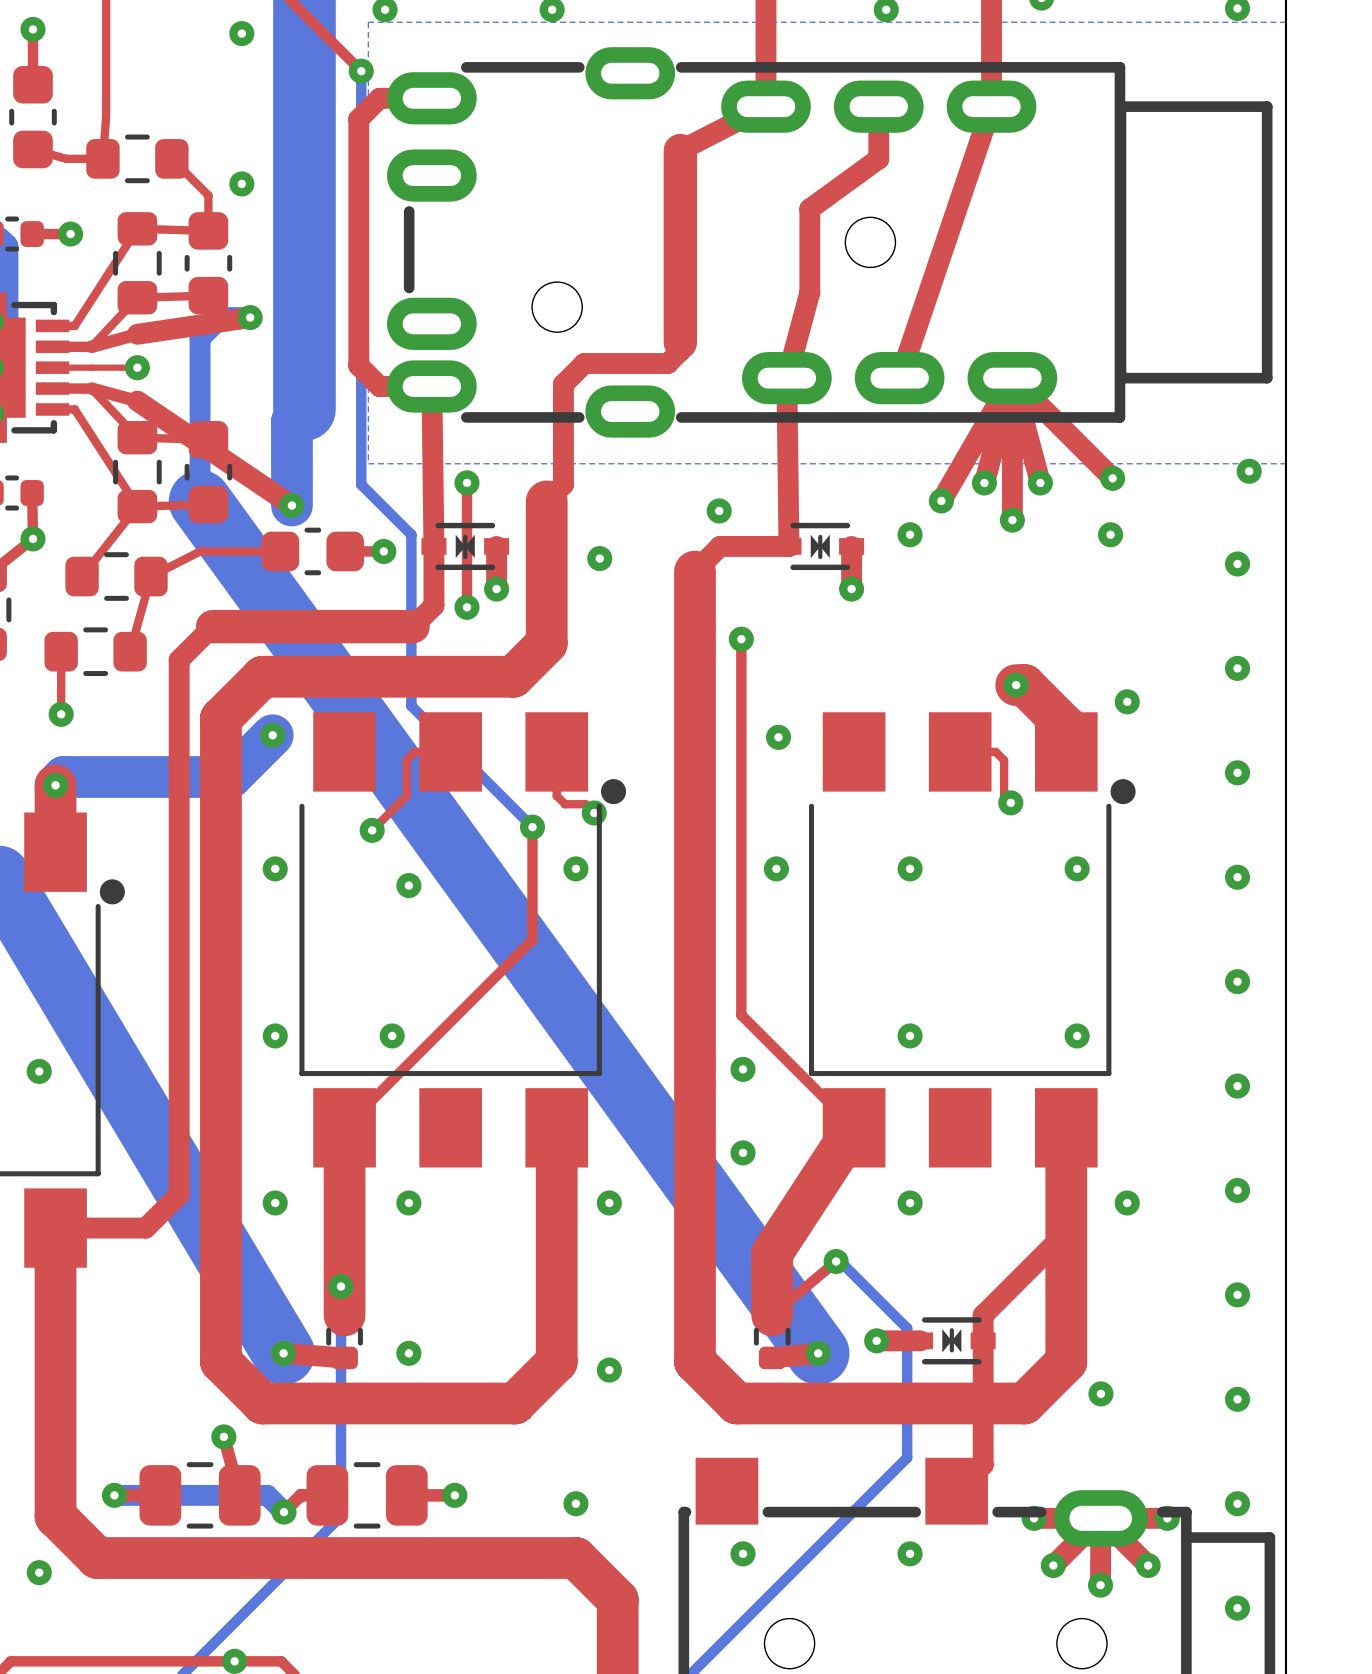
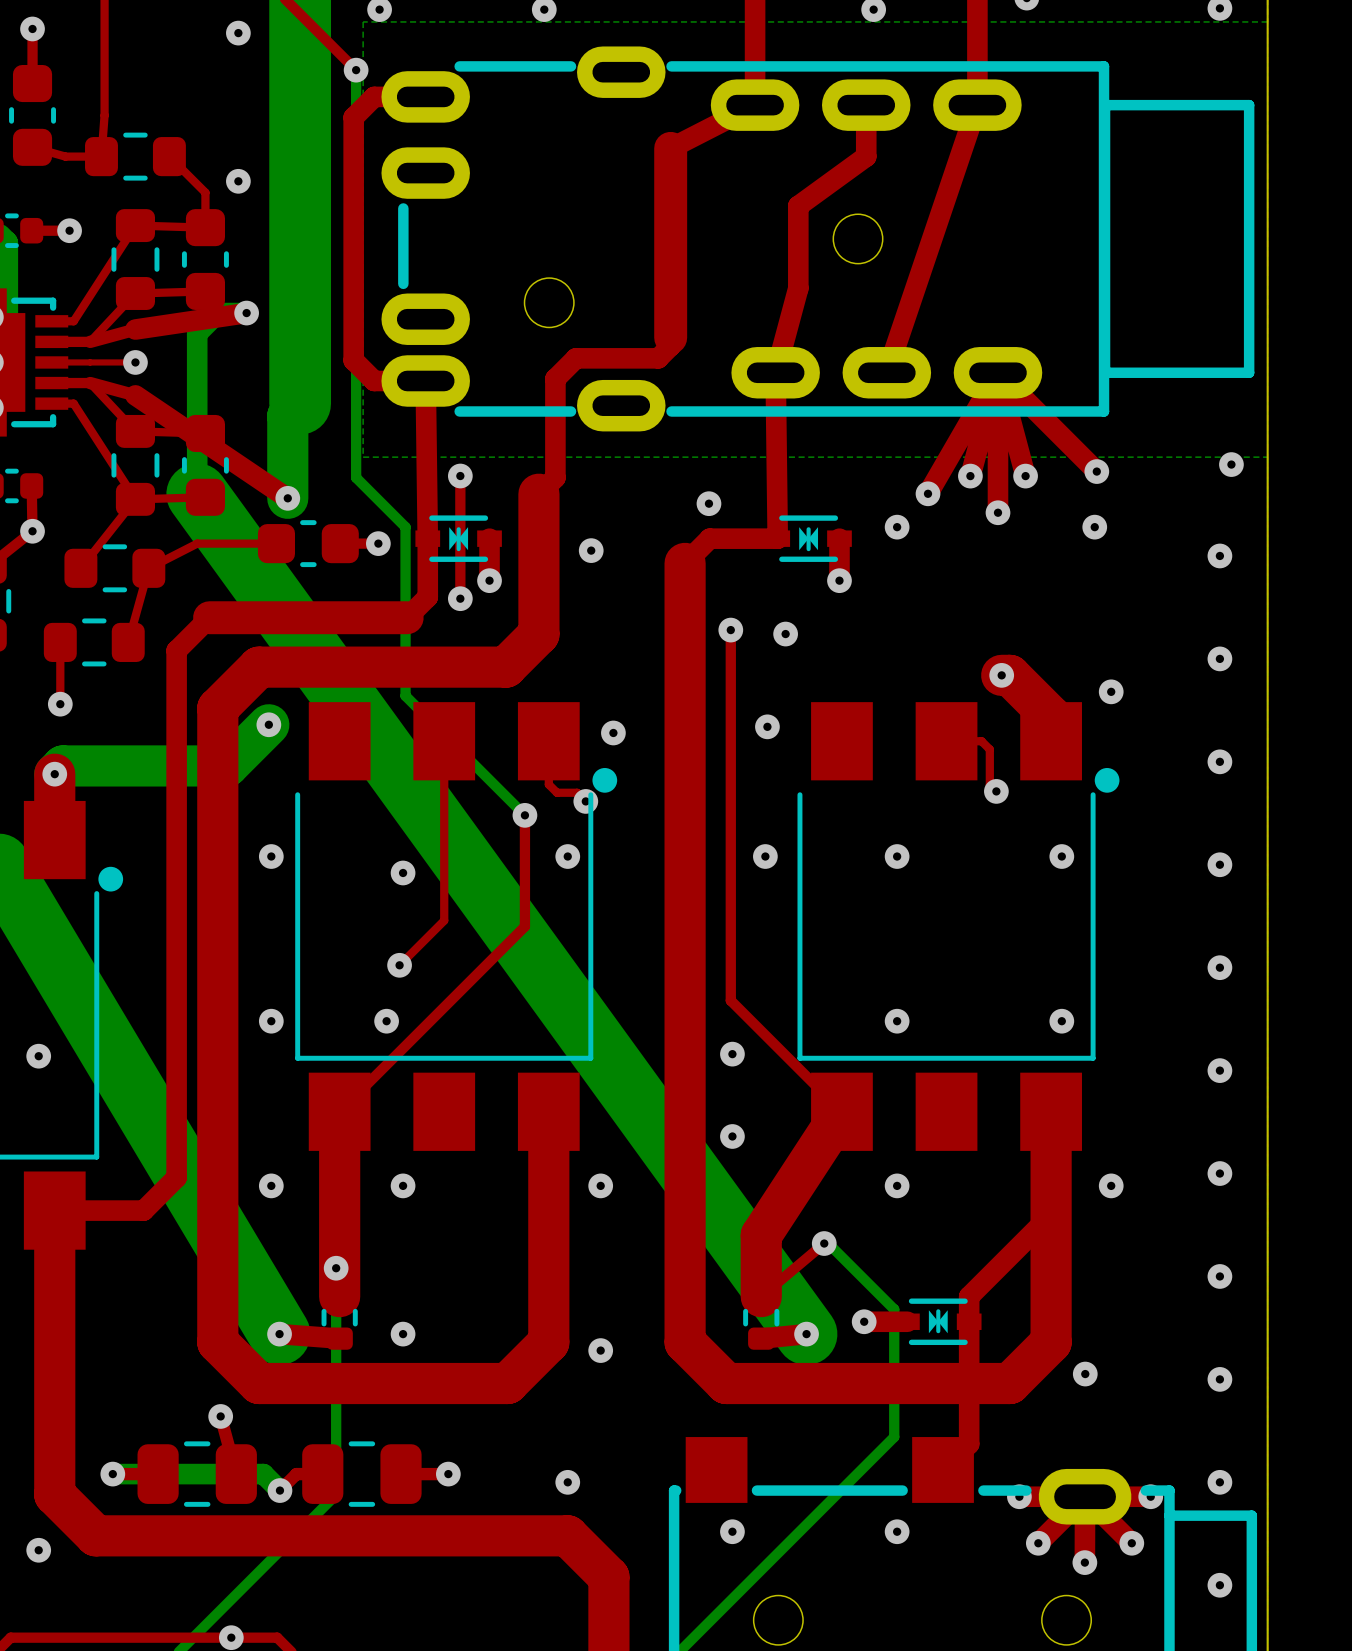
via: none -> (785, 634)
via: none -> (613, 732)
top track: (450, 751) (415, 751) (406, 760) (406, 795) (372, 830) -> (444, 741) (444, 920) (399, 965)
via: (372, 830) -> none
via: none -> (399, 965)

